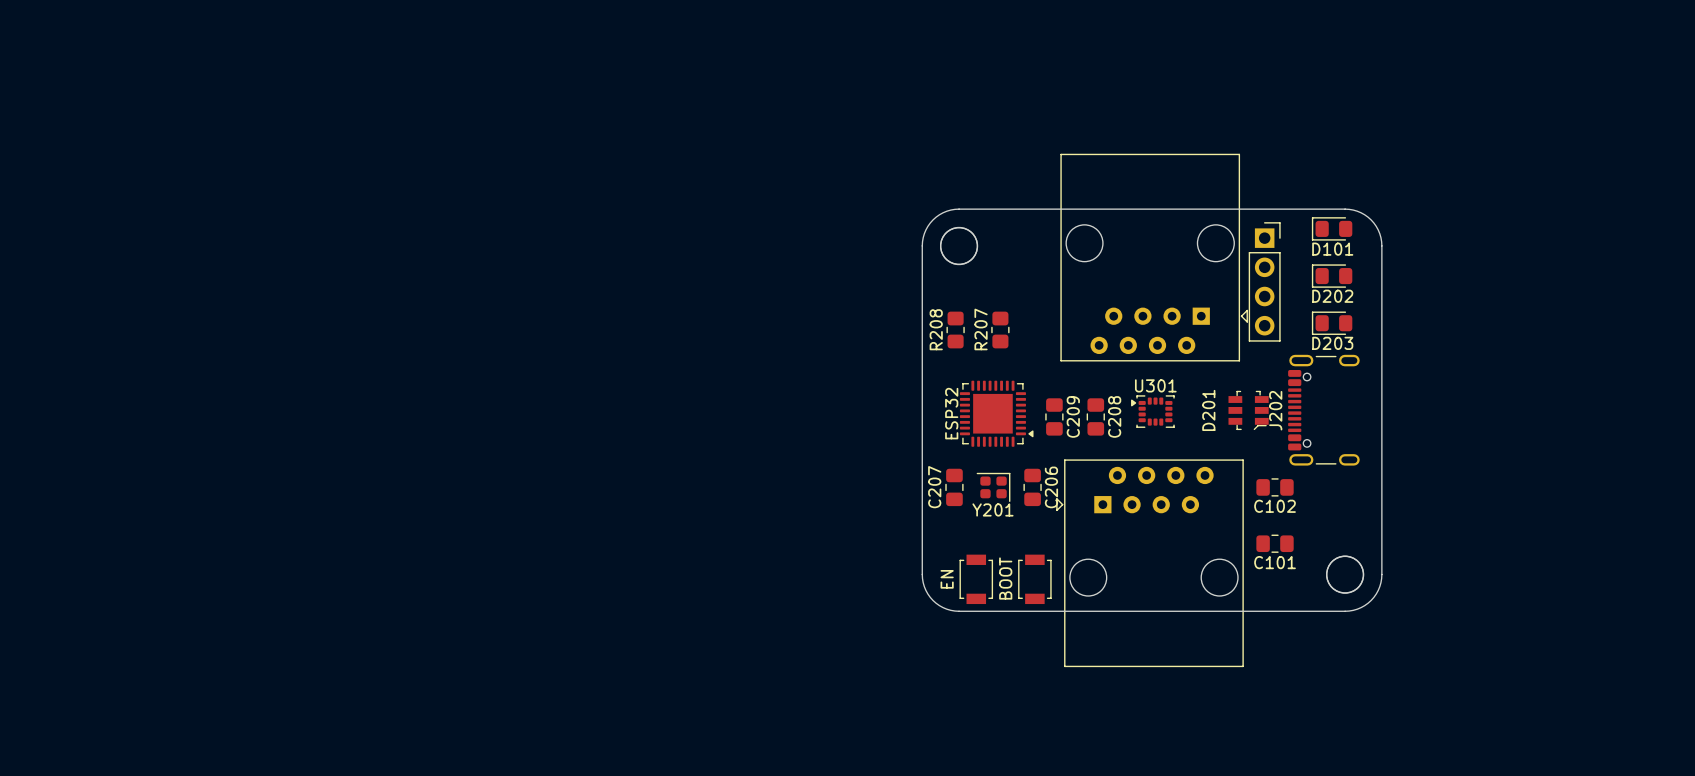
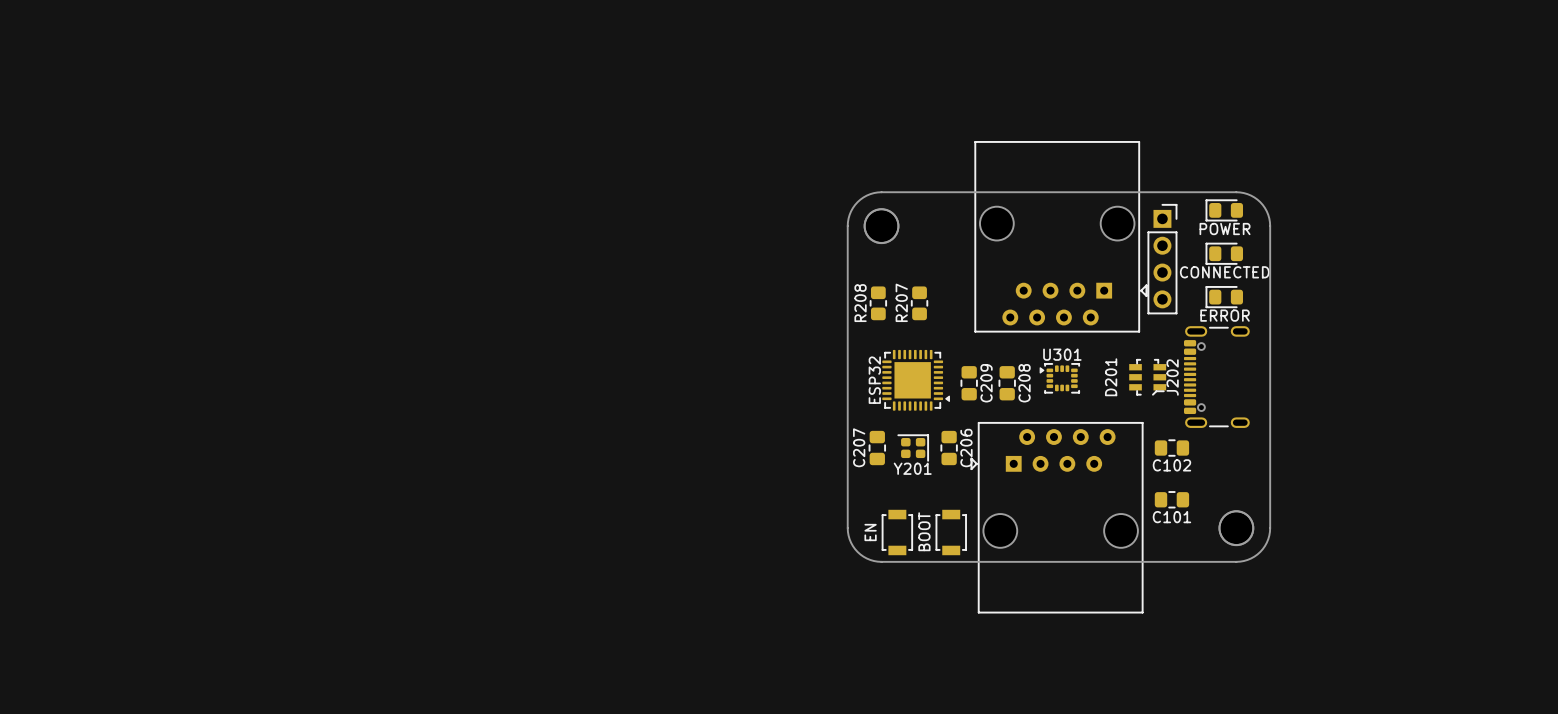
D101 name: D101 (1332, 249) -> POWER (1225, 229)
D202 name: D202 (1332, 296) -> CONNECTED (1224, 272)
D203 name: D203 (1332, 343) -> ERROR (1225, 315)

